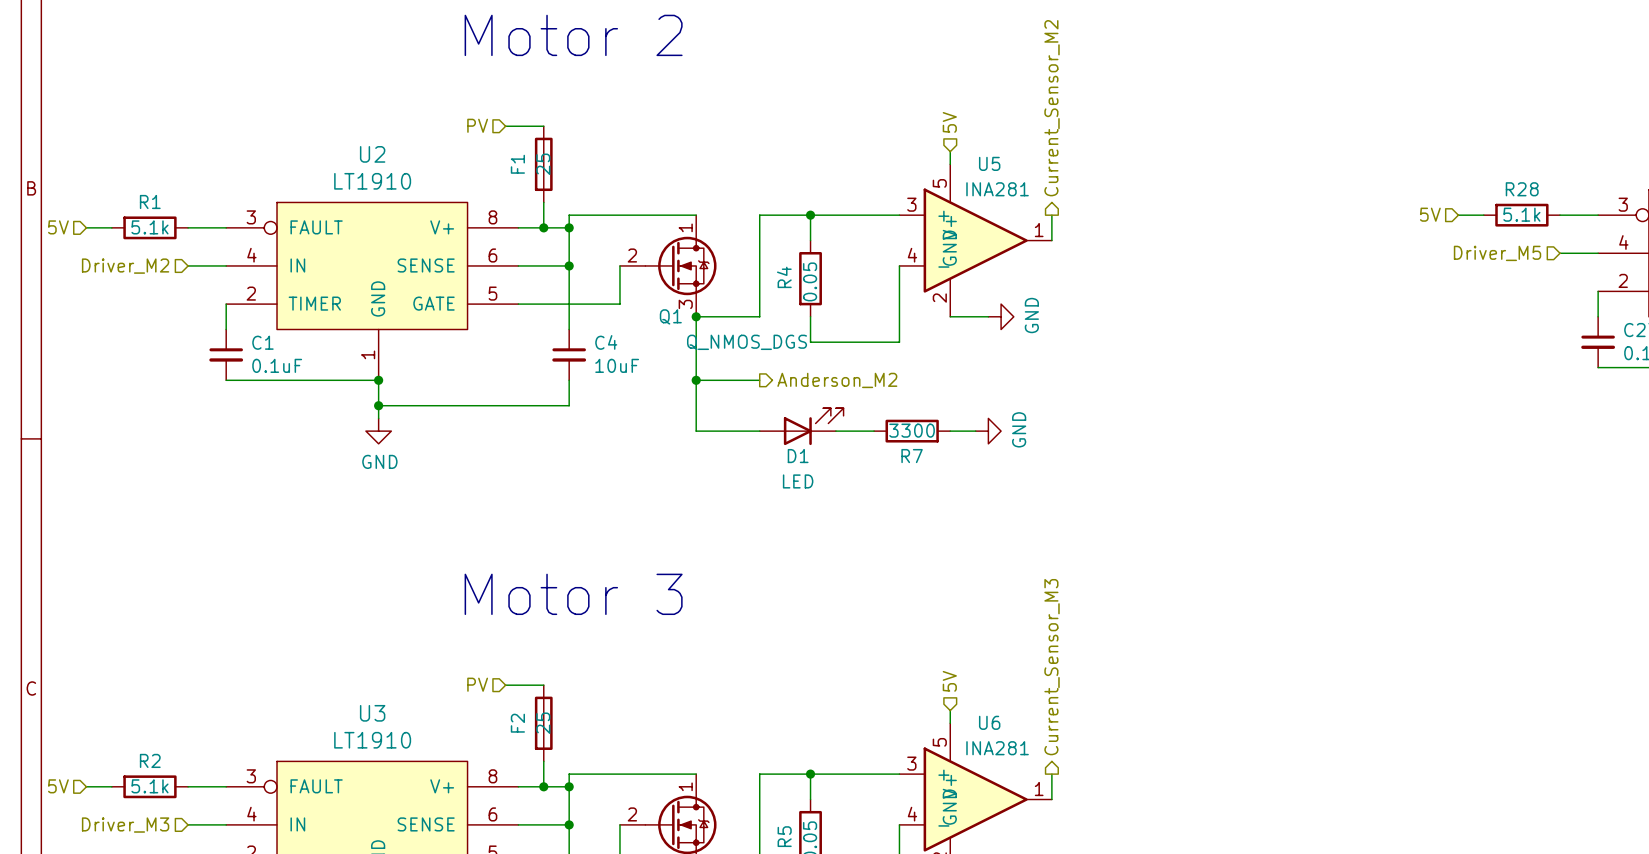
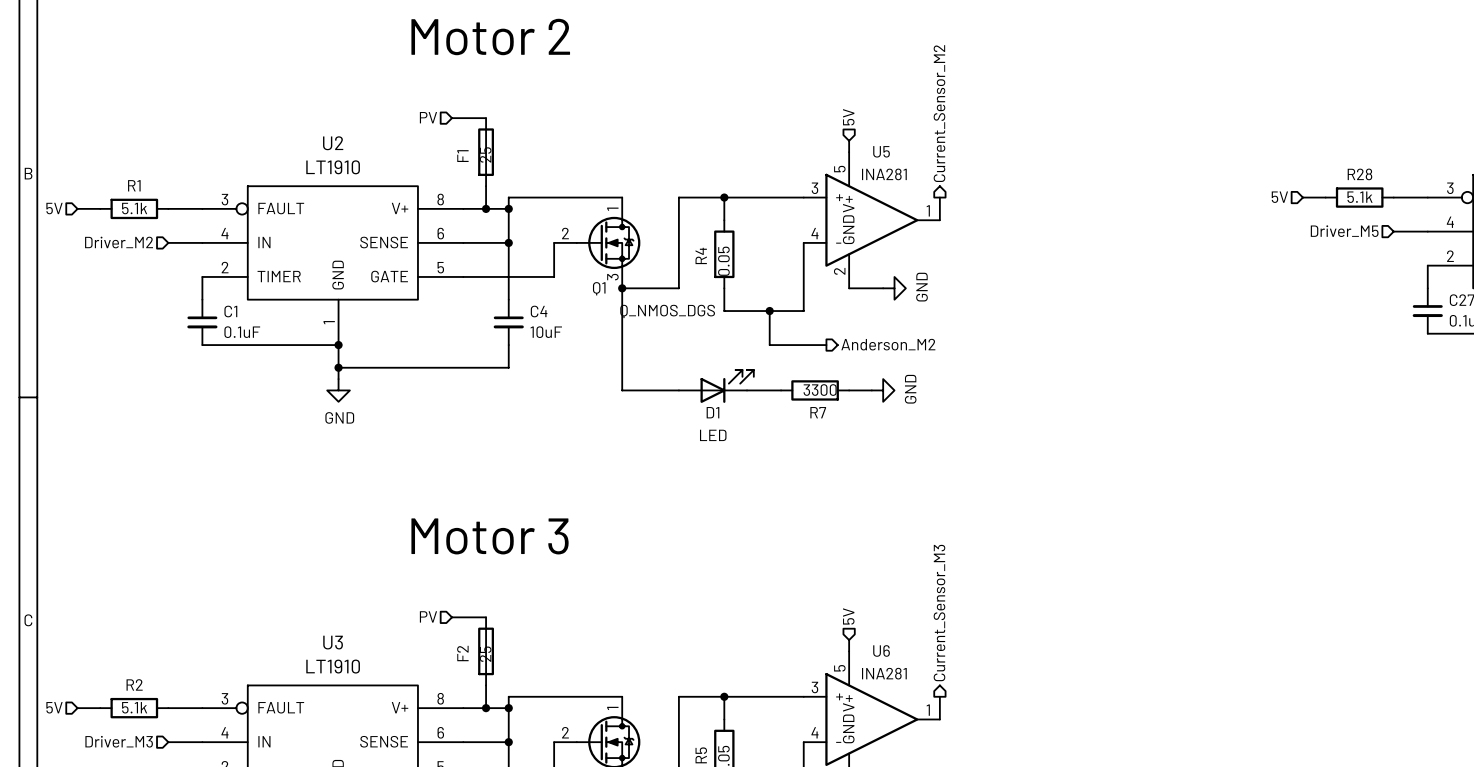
wire: none -> (769, 311) (769, 345) (826, 345)
junction: none -> (769, 311)
wire: (696, 380) (759, 380) -> none
junction: (696, 380) -> none
hierarchical label position: Anderson_M2 (837, 380) -> Anderson_M2 (888, 344)

